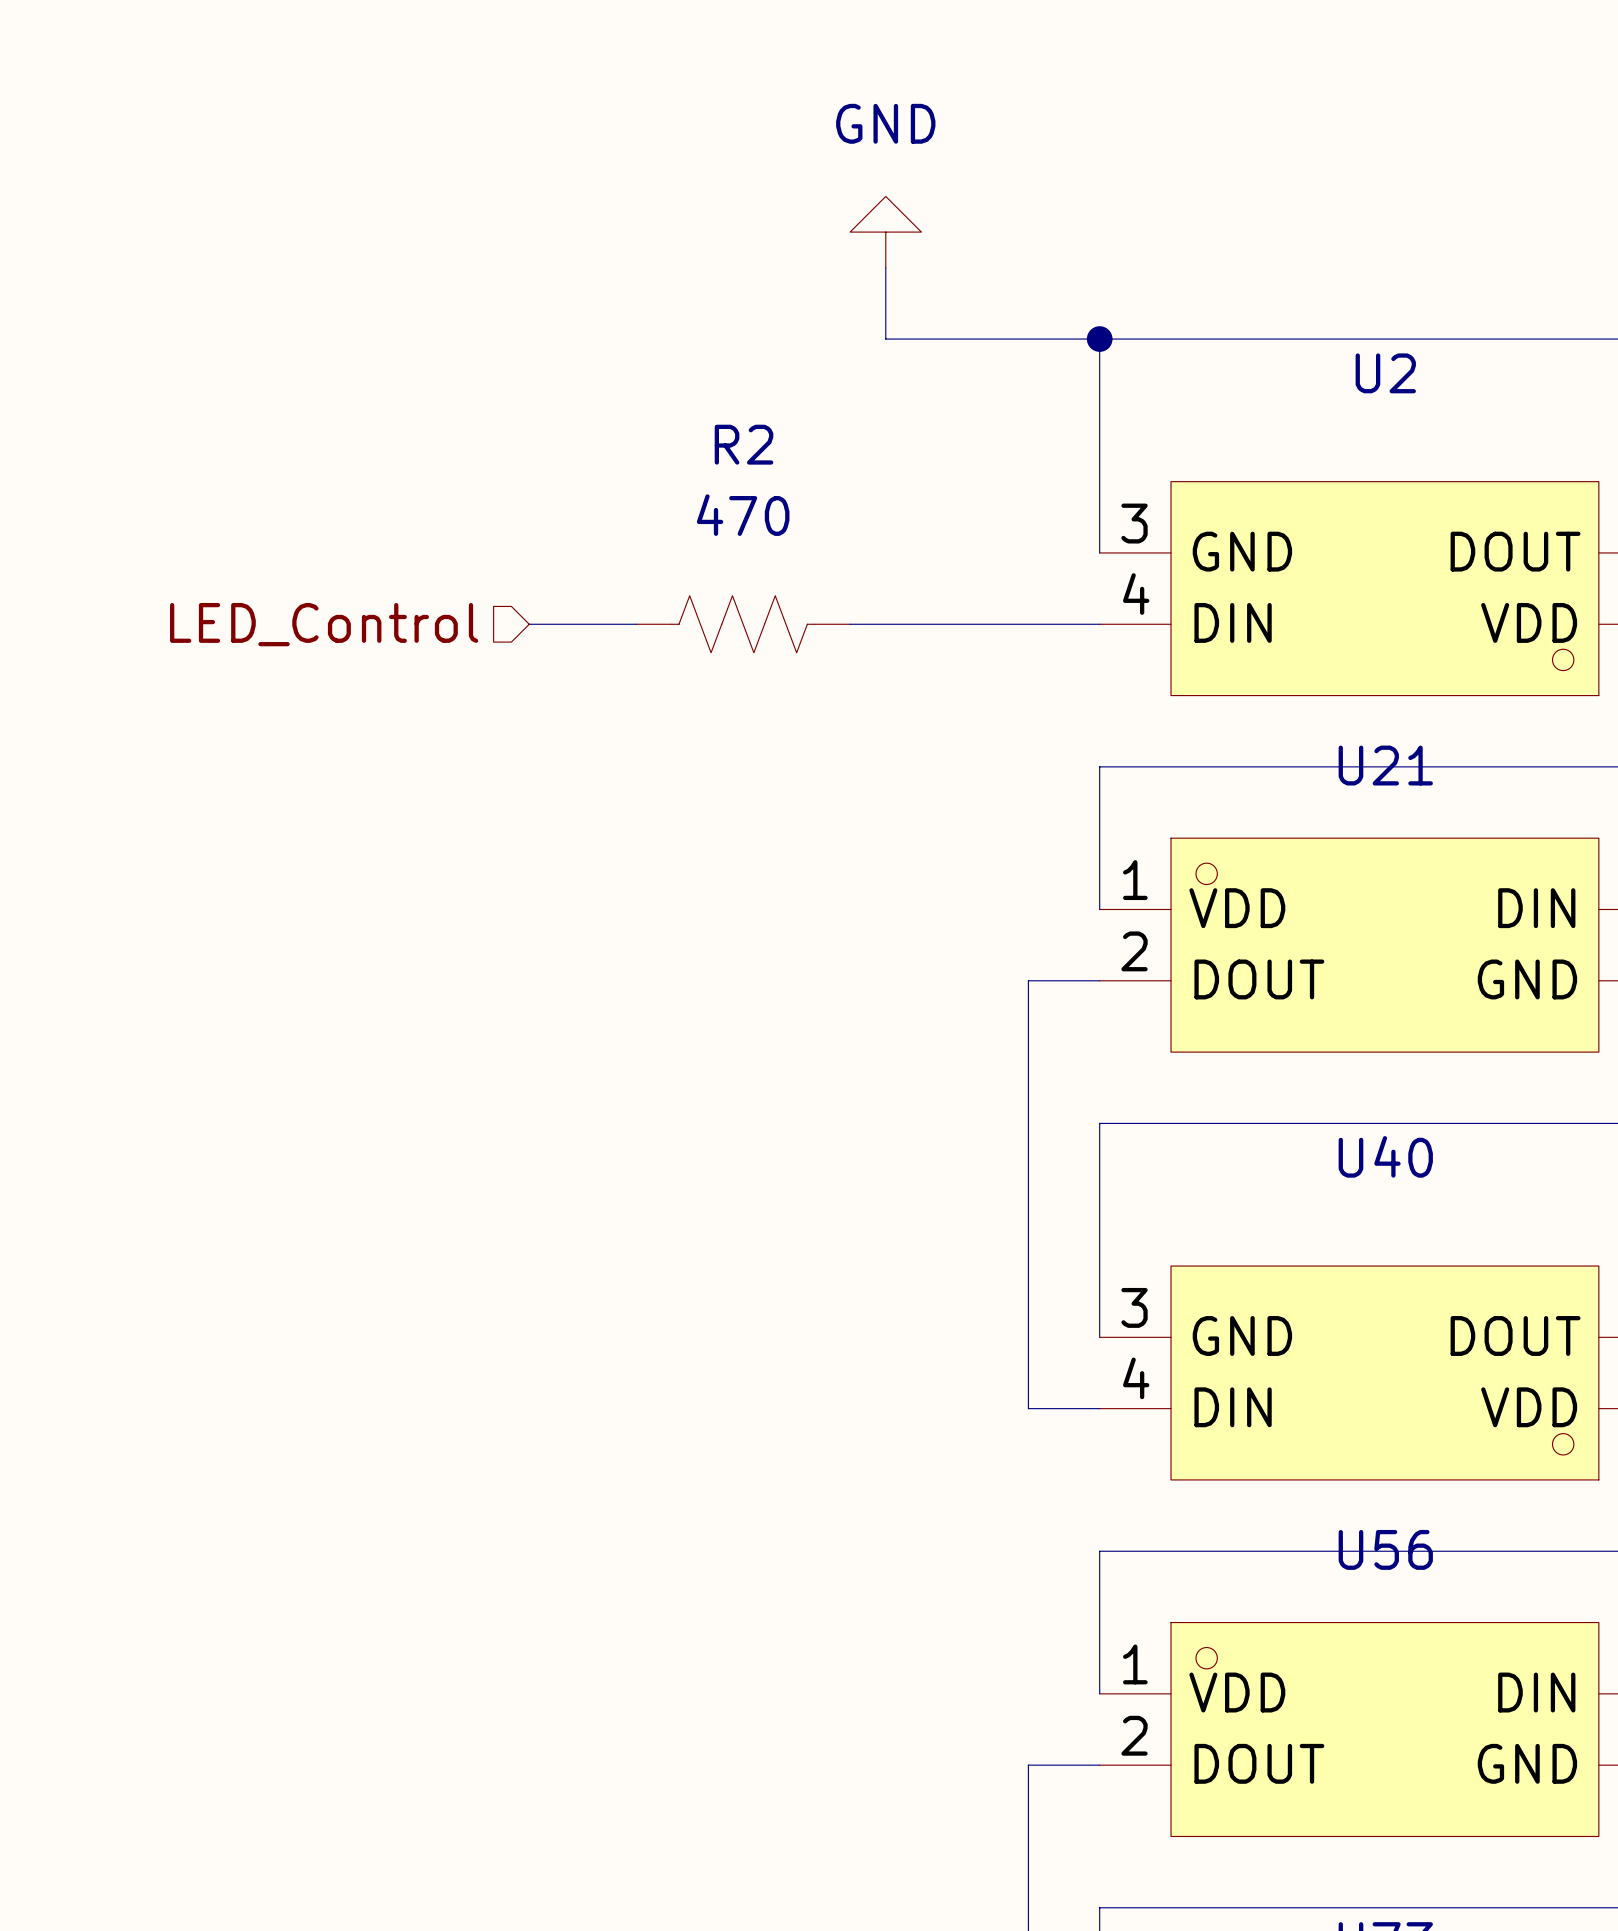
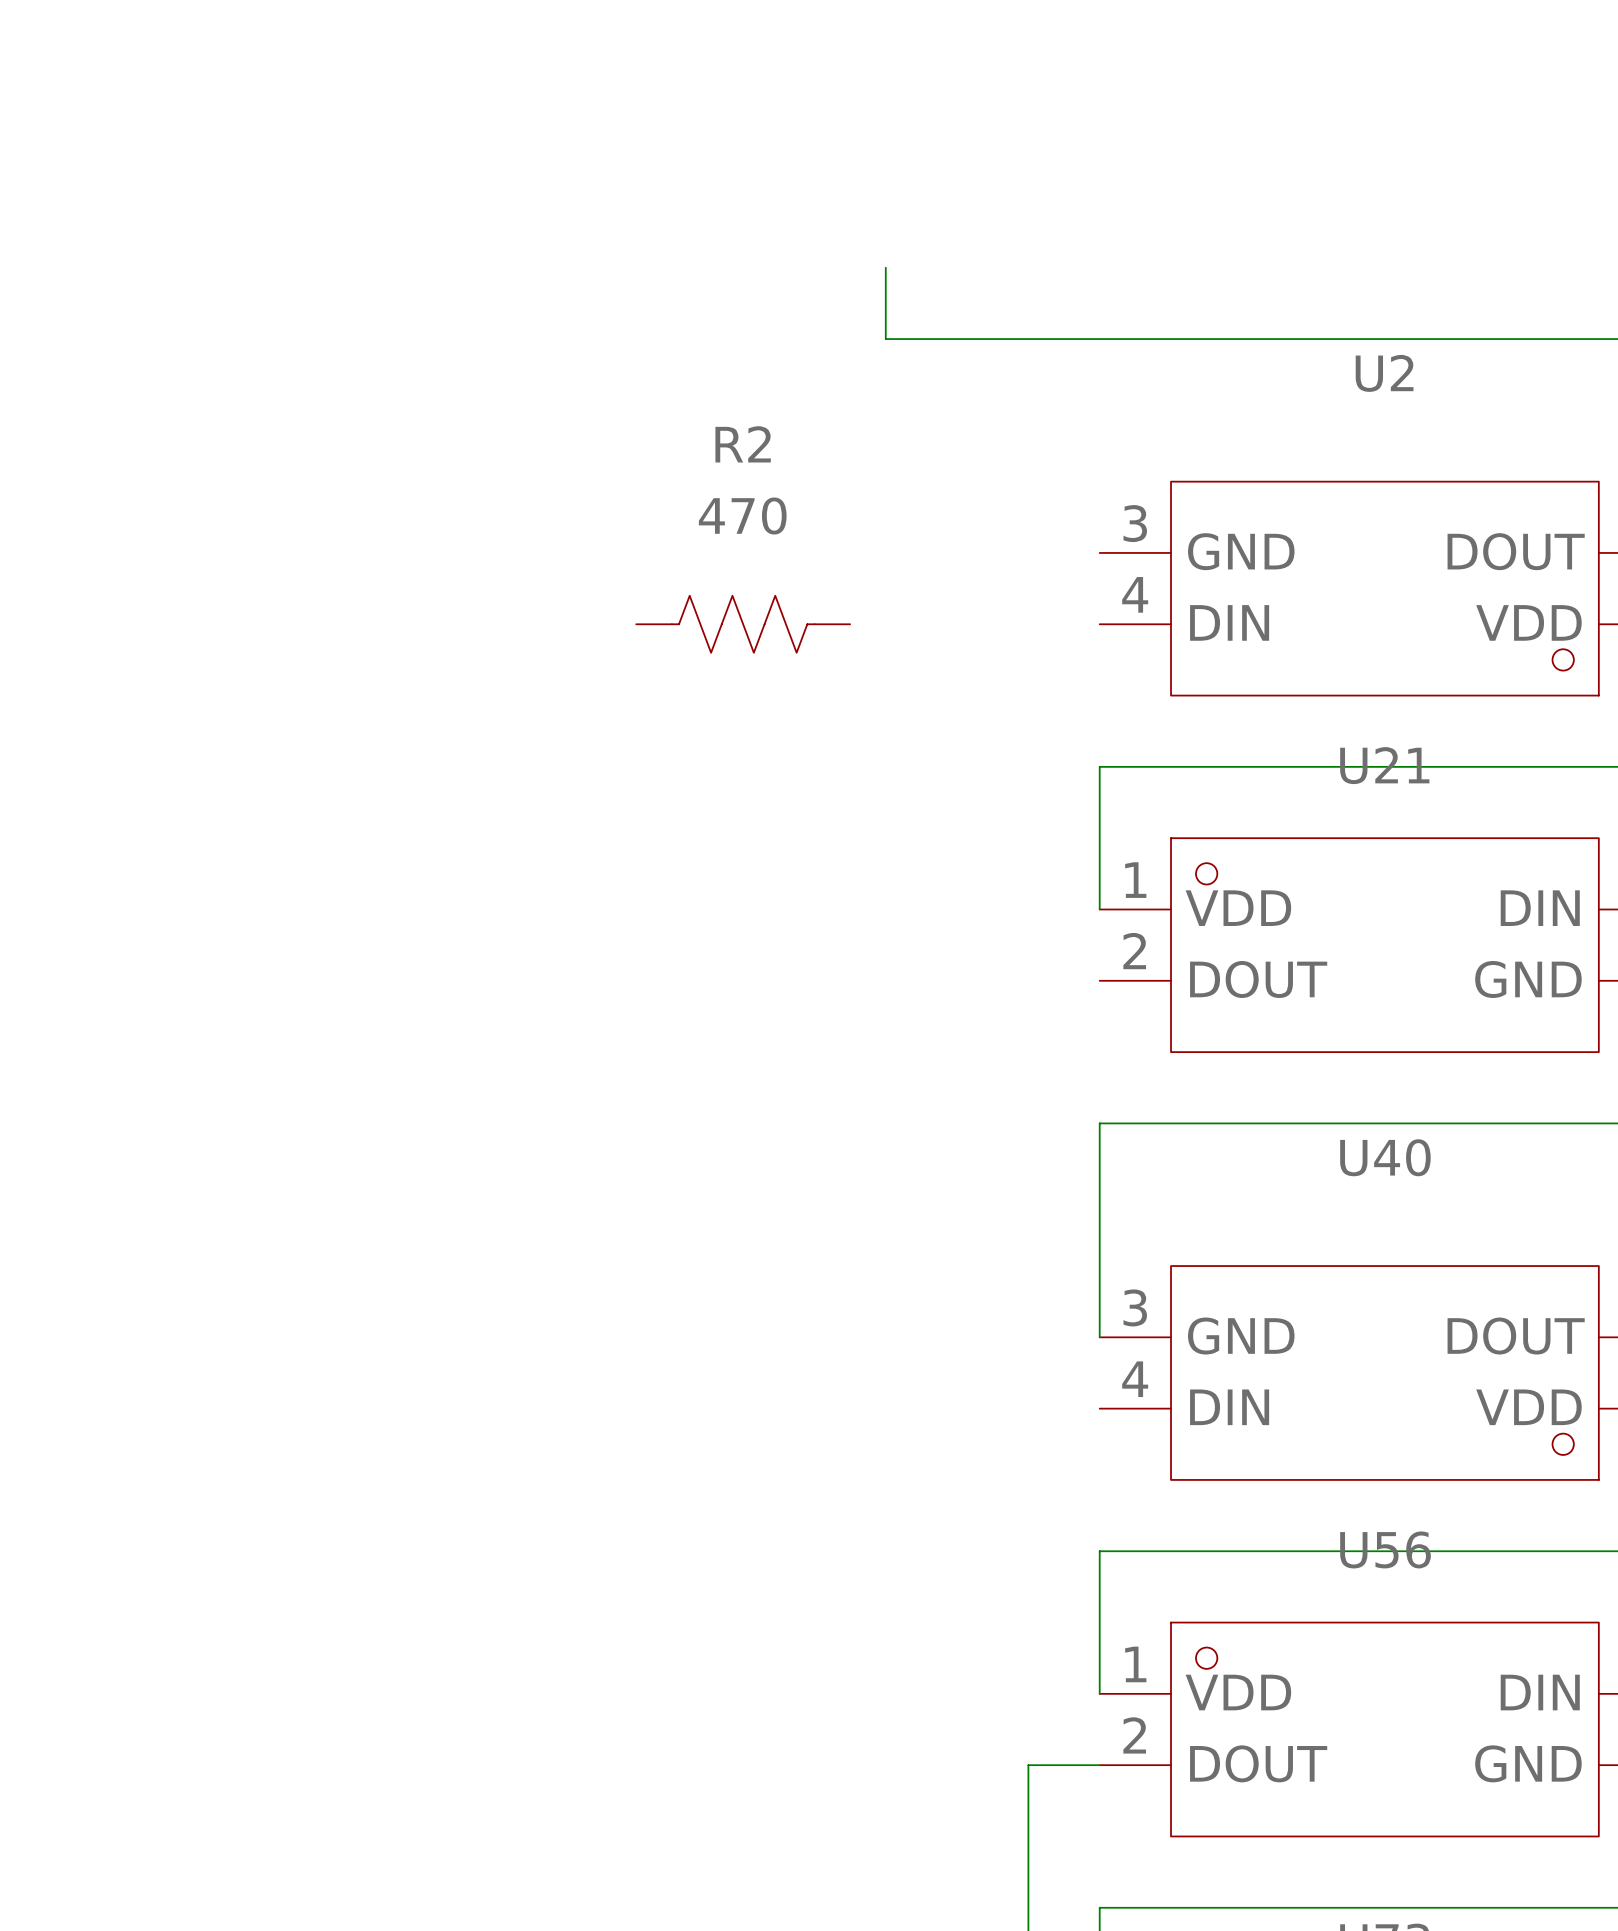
power symbol: GND (885, 232) -> none
wire: (1099, 339) (1099, 552) -> none
junction: (1099, 339) -> none
hierarchical label: LED_Control (324, 624) -> none
wire: (529, 624) (636, 624) -> none
wire: (850, 624) (1099, 624) -> none
wire: (1099, 980) (1028, 980) (1028, 1408) (1099, 1408) -> none

